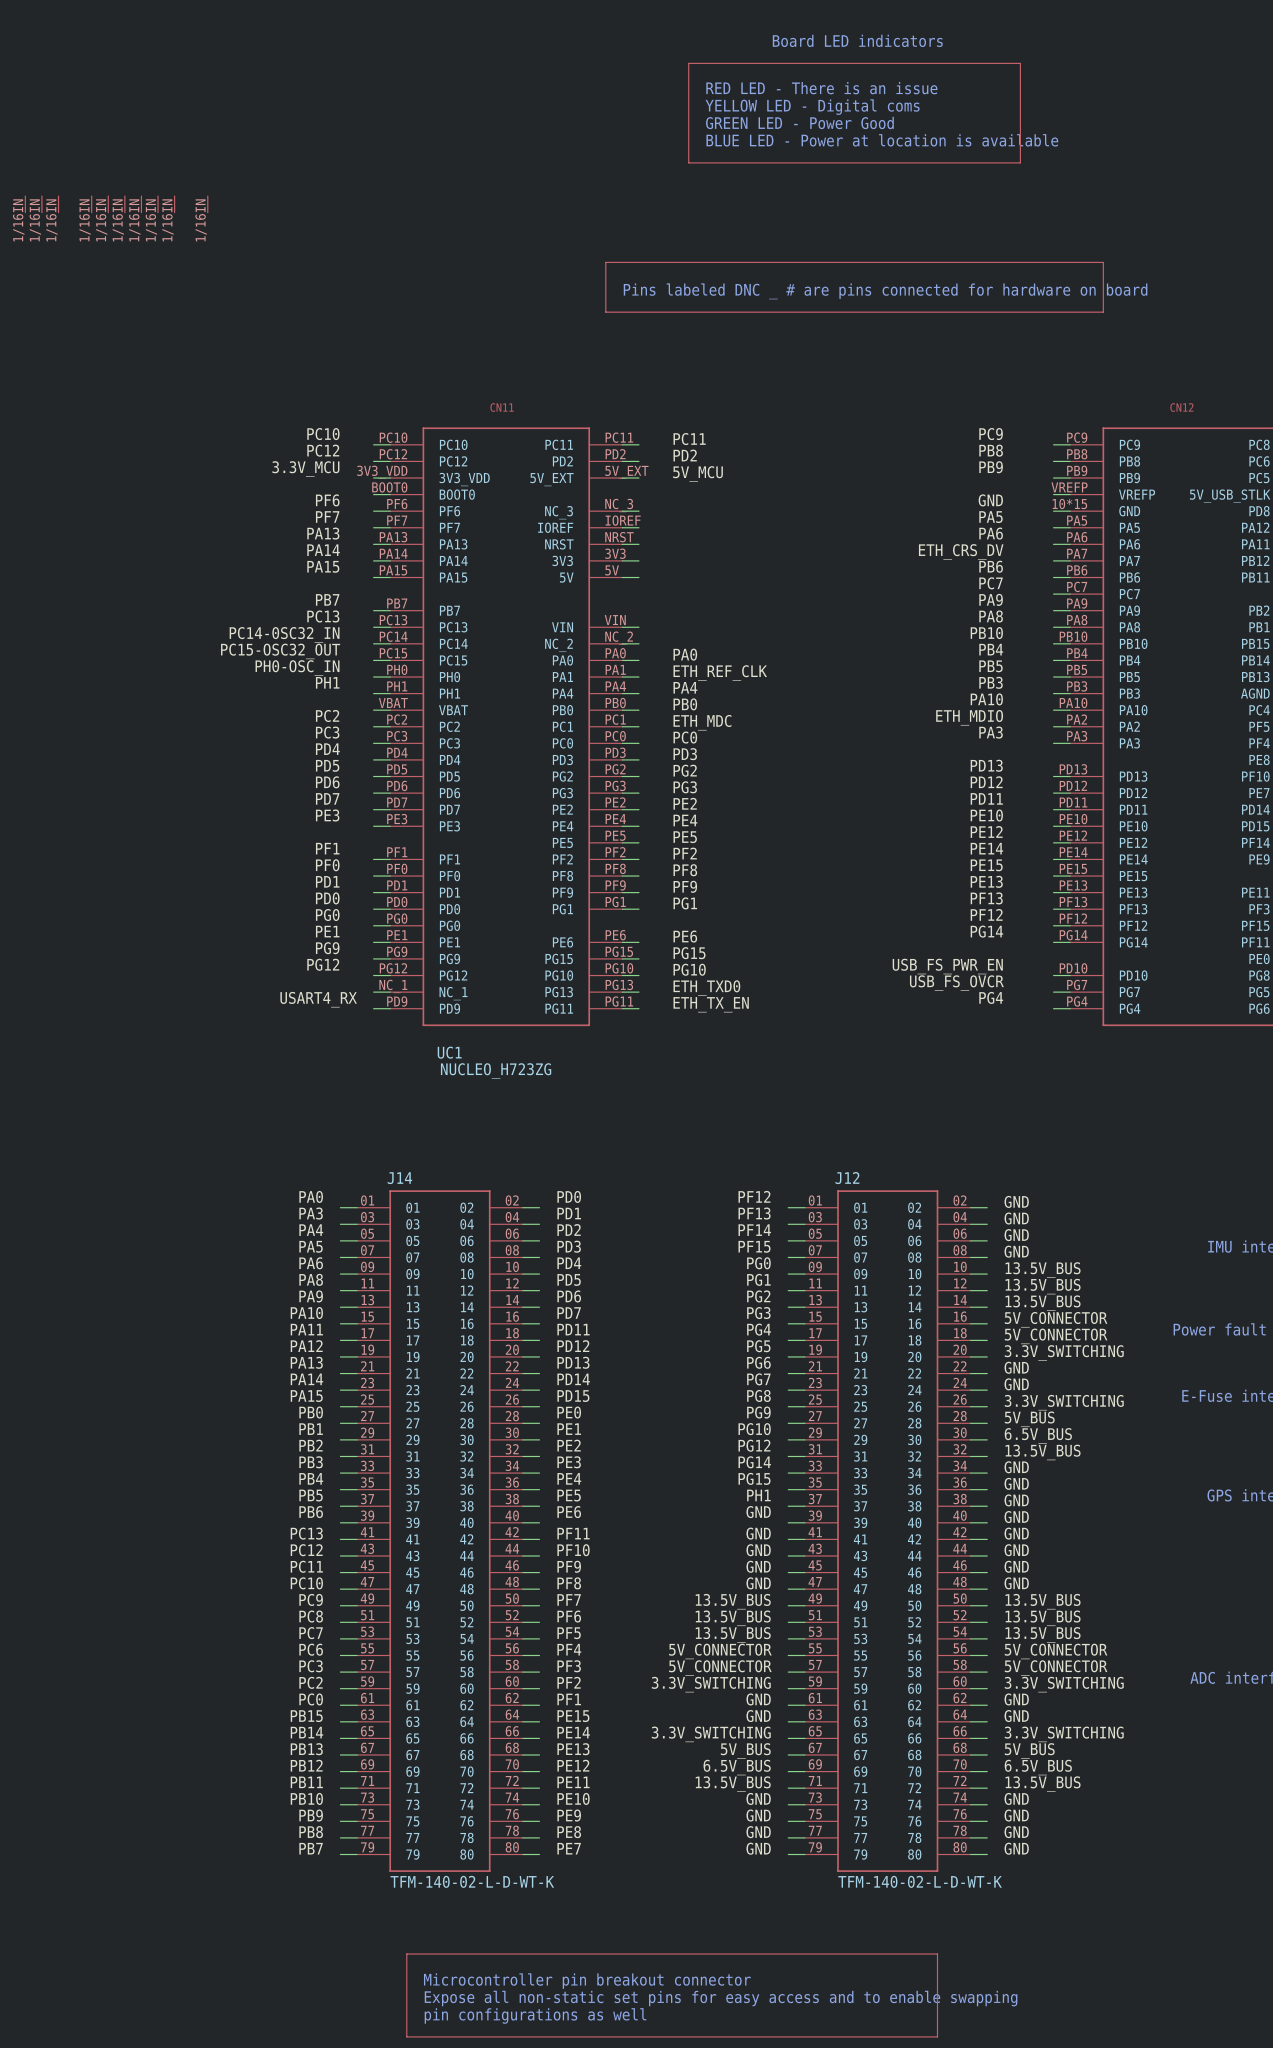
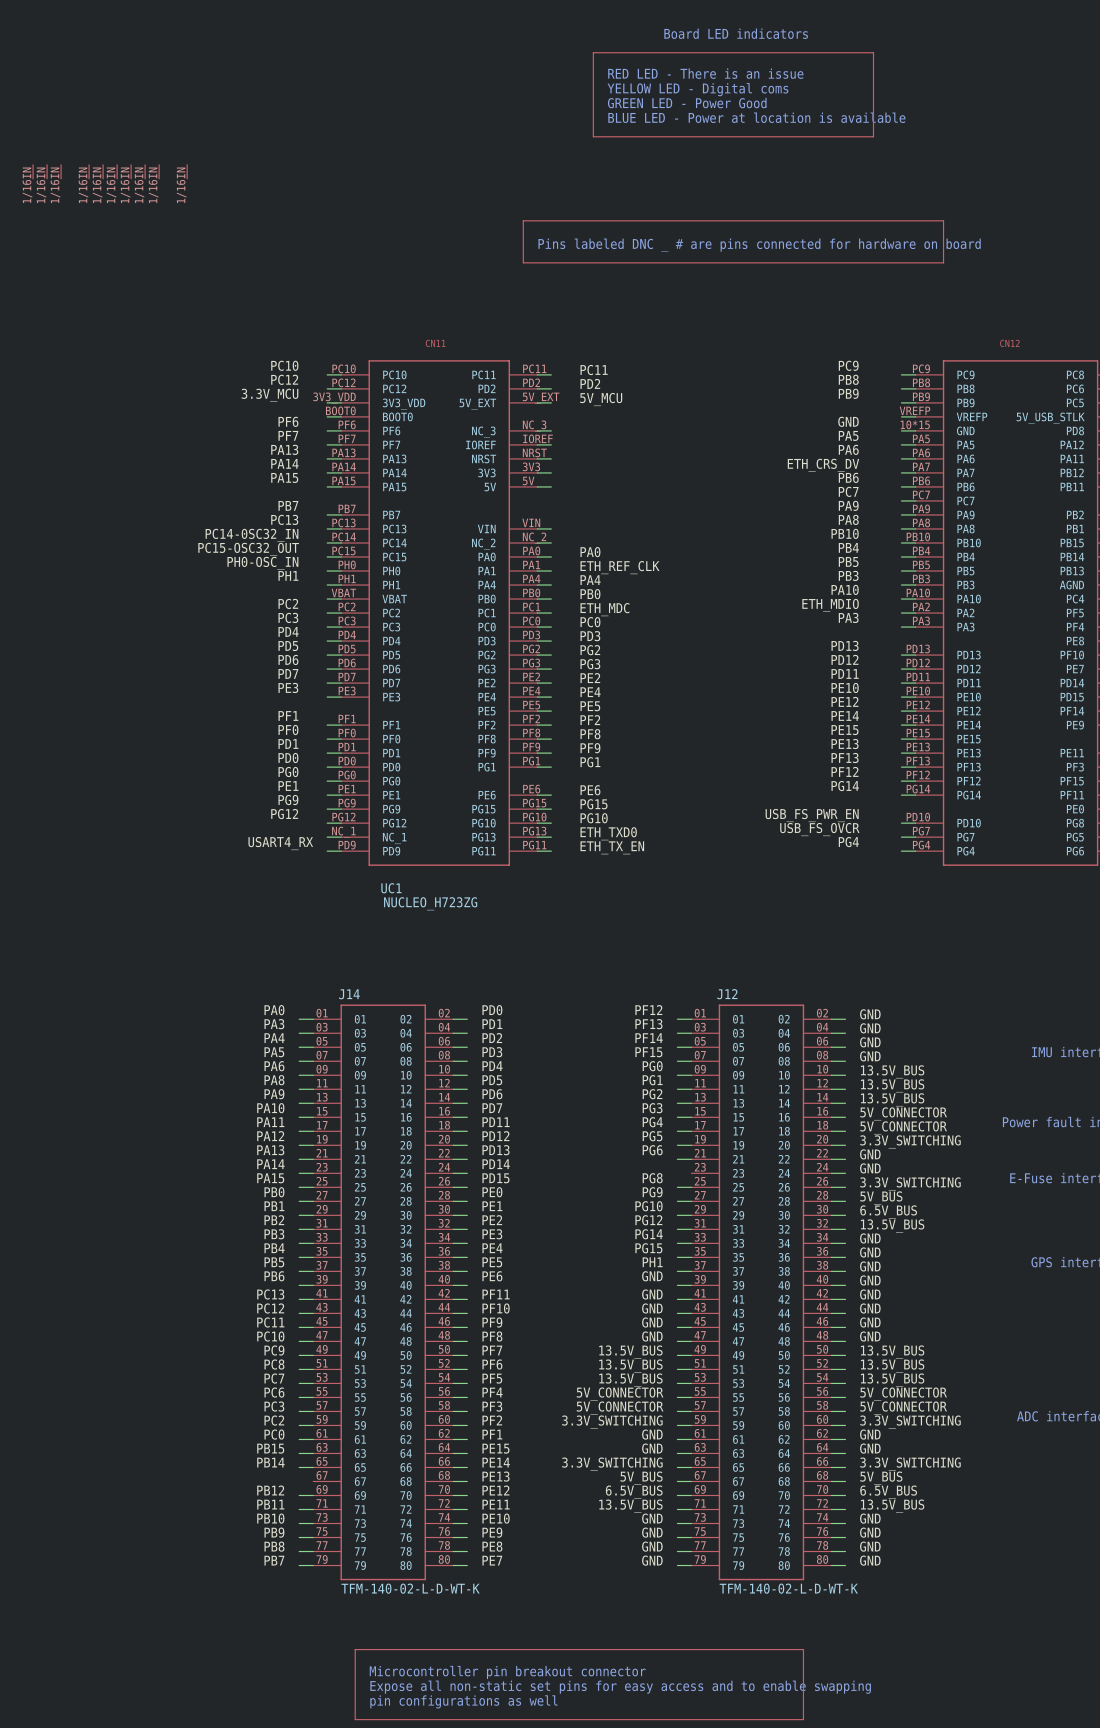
label: PG7 (758, 1379) -> none
wire: (788, 1390) (804, 1390) -> none
label: PB13 (306, 1749) -> none
wire: (340, 1755) (357, 1755) -> none

